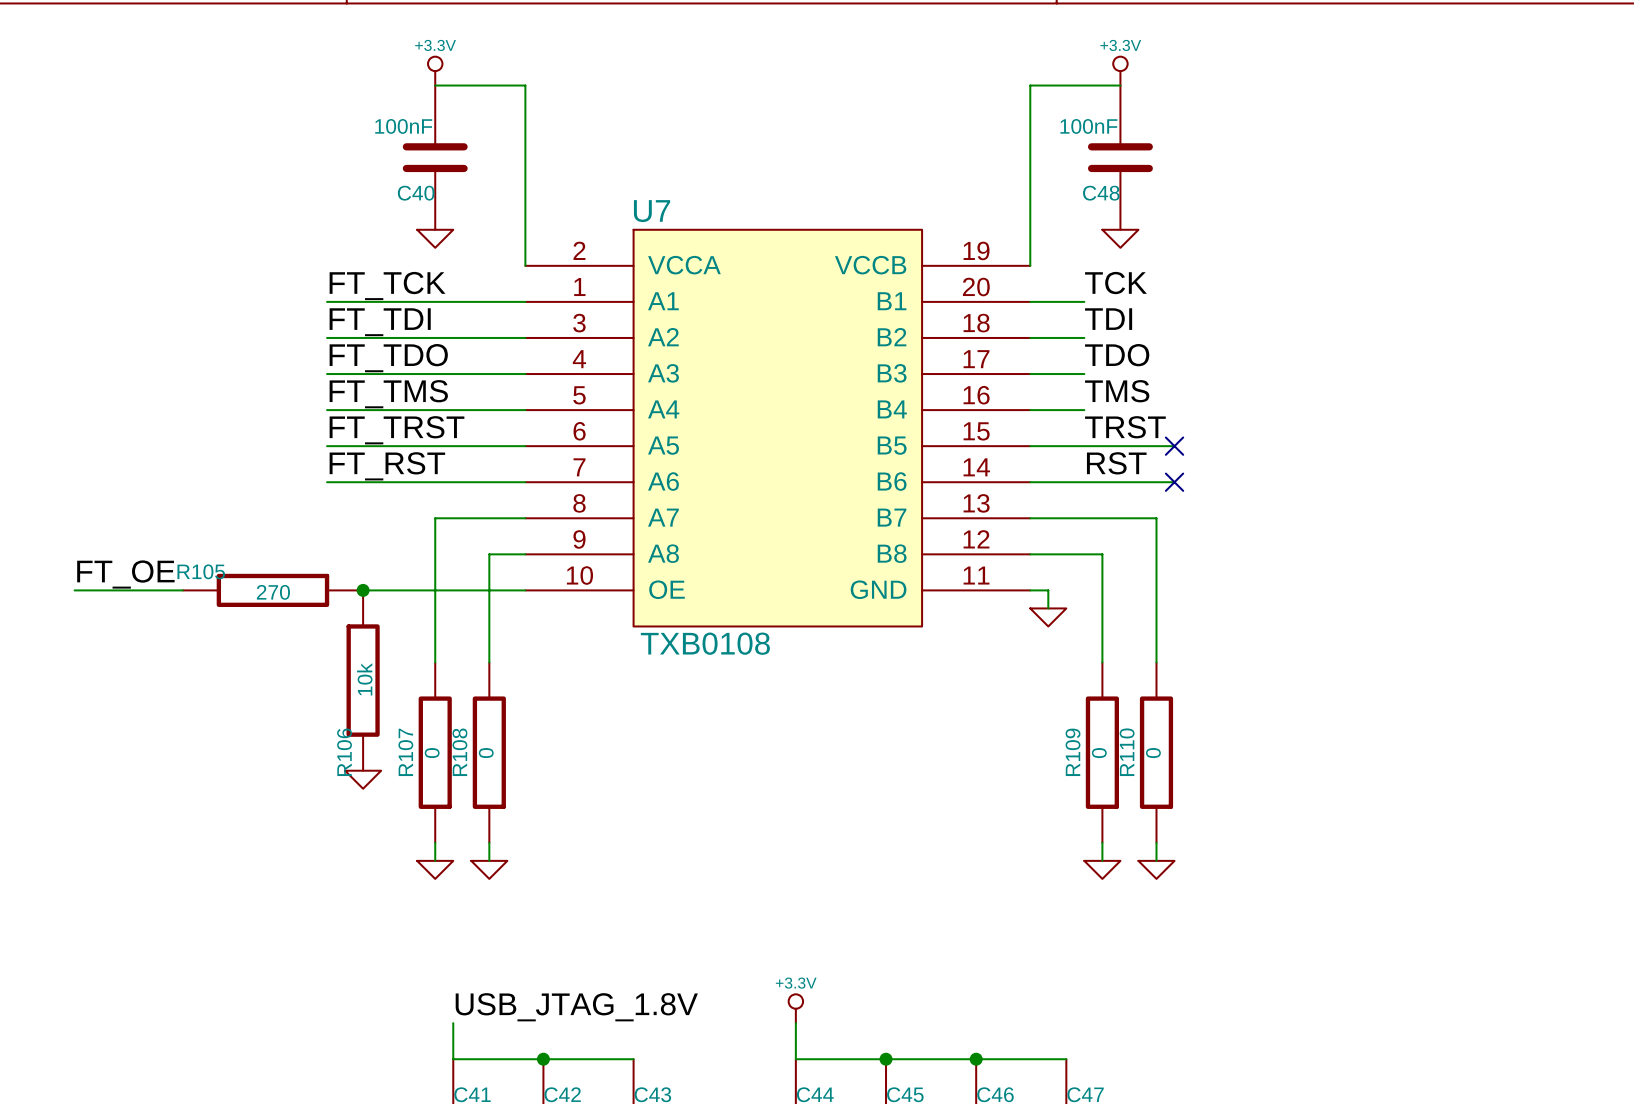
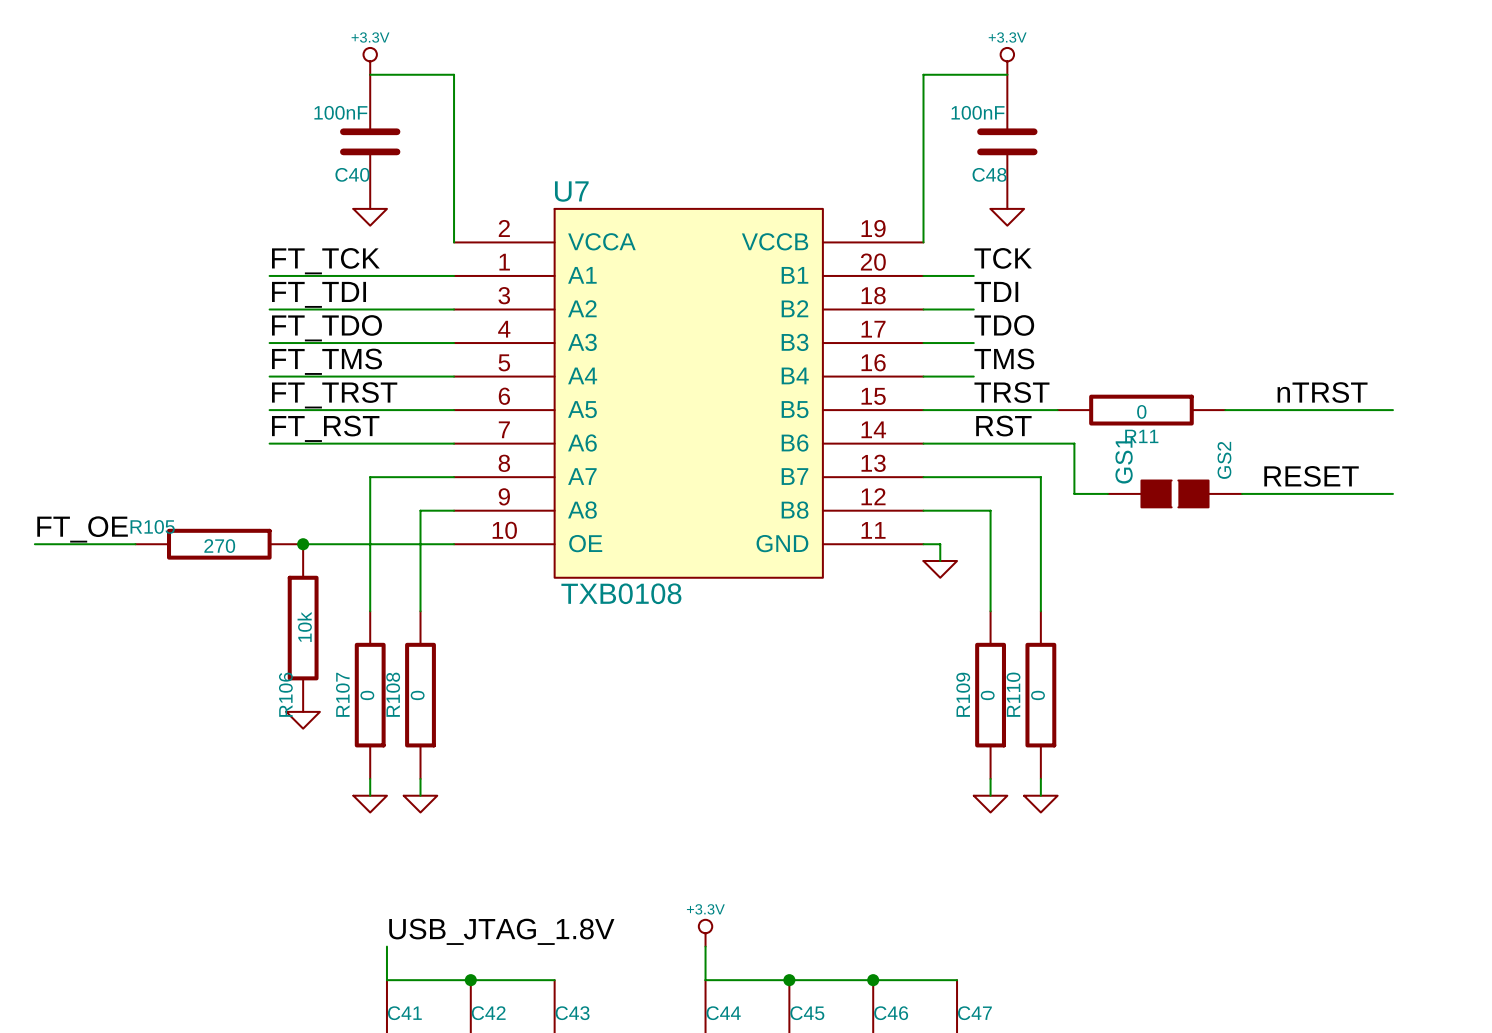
label: none -> nTRST (1322, 392)
no-connect mark: (1174, 446) -> none
R11: none -> 0 (1141, 410)
wire: none -> (1225, 410) (1392, 410)
wire: none -> (1057, 443) (1074, 443) (1074, 493) (1107, 493)
no-connect mark: (1174, 482) -> none
label: none -> RESET (1311, 476)
GS1: none -> GS2 (1175, 493)
wire: none -> (1242, 493) (1392, 493)

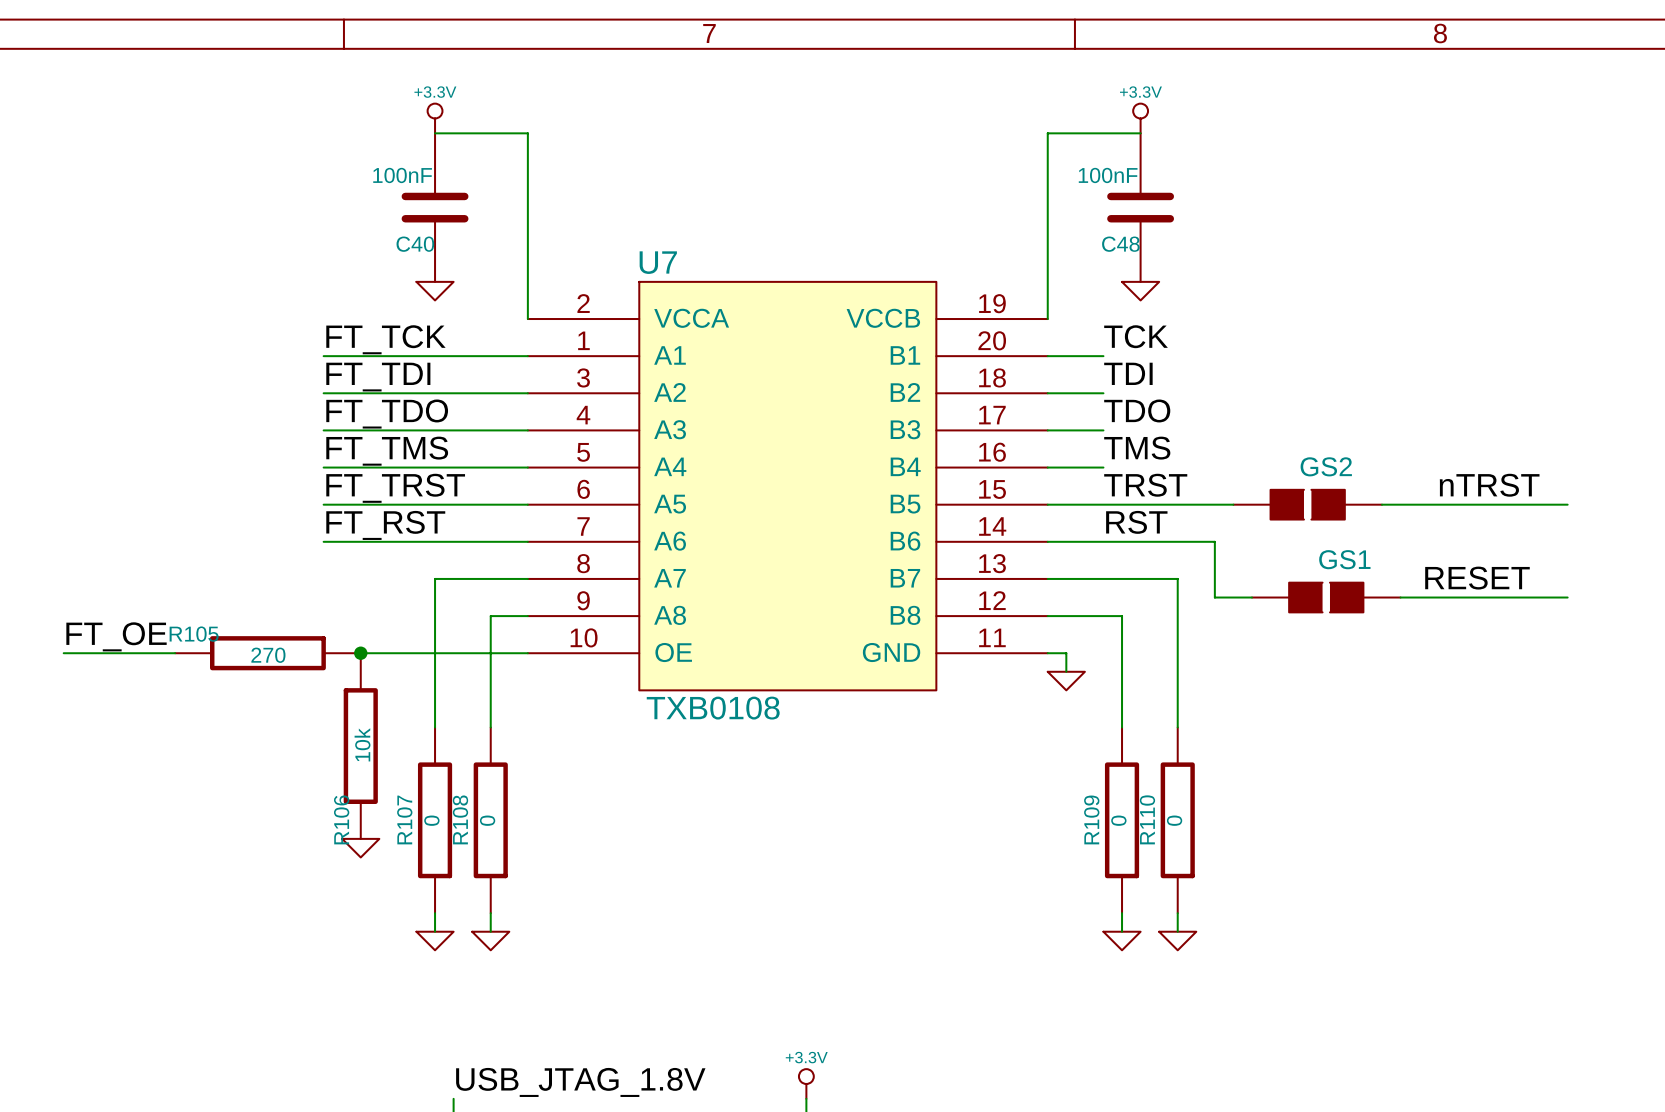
R11: 0 (1141, 410) -> none
GS2: none -> (1307, 504)
GS1 name rotation: 0° (1124, 460) -> 90° clockwise (1344, 559)
GS1 name position: GS1 (1124, 460) -> GS1 (1344, 559)
GS1 value: GS2 (1224, 460) -> none

